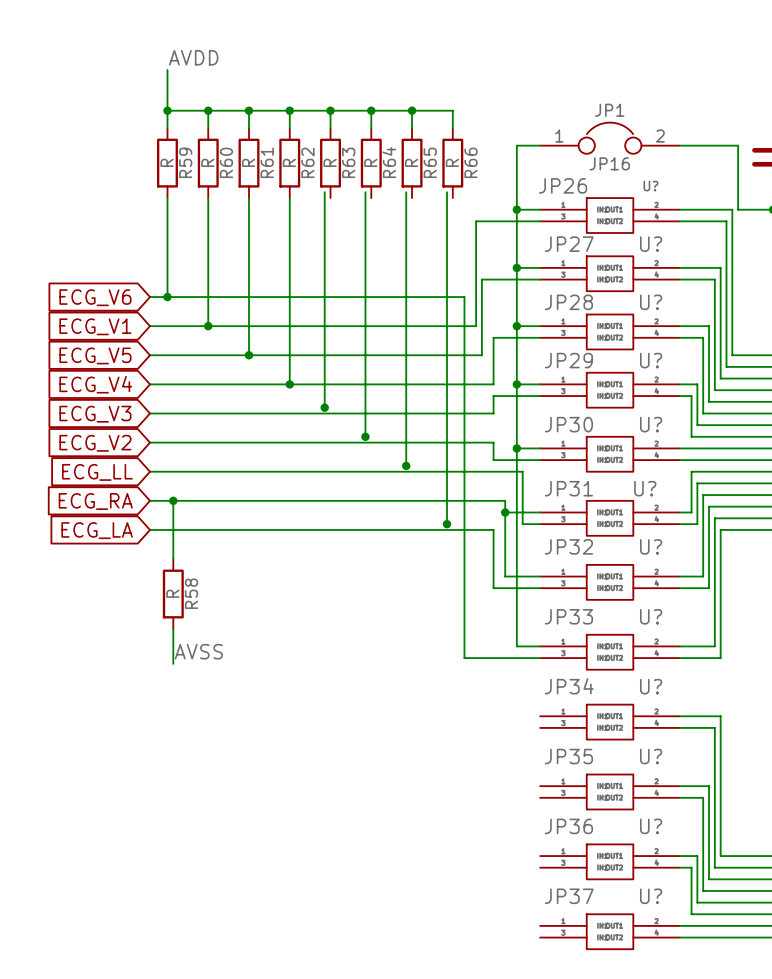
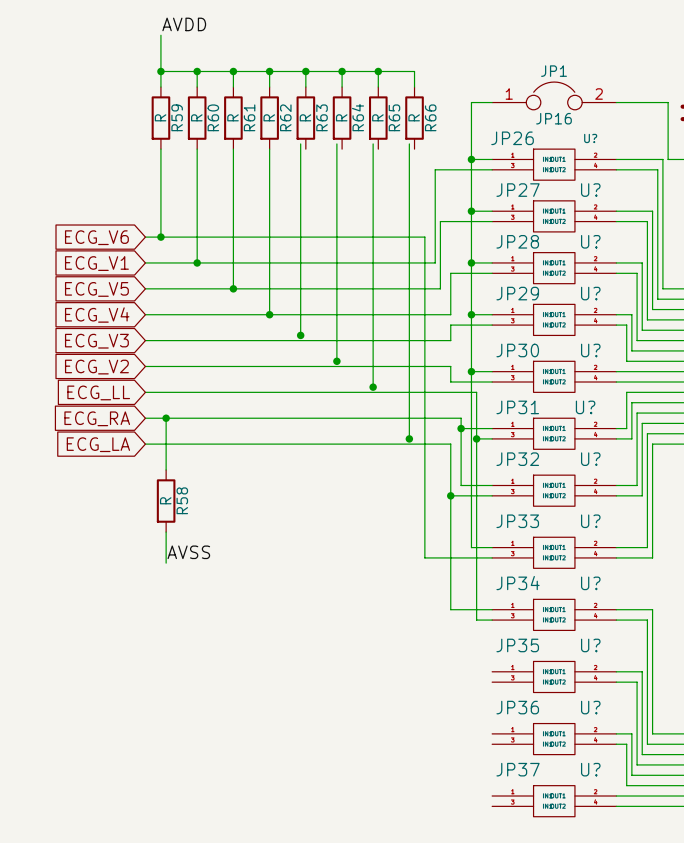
wire: none -> (476, 438) (476, 620) (492, 620)
junction: none -> (476, 438)
wire: none -> (450, 495) (450, 609) (492, 609)
junction: none -> (450, 495)

